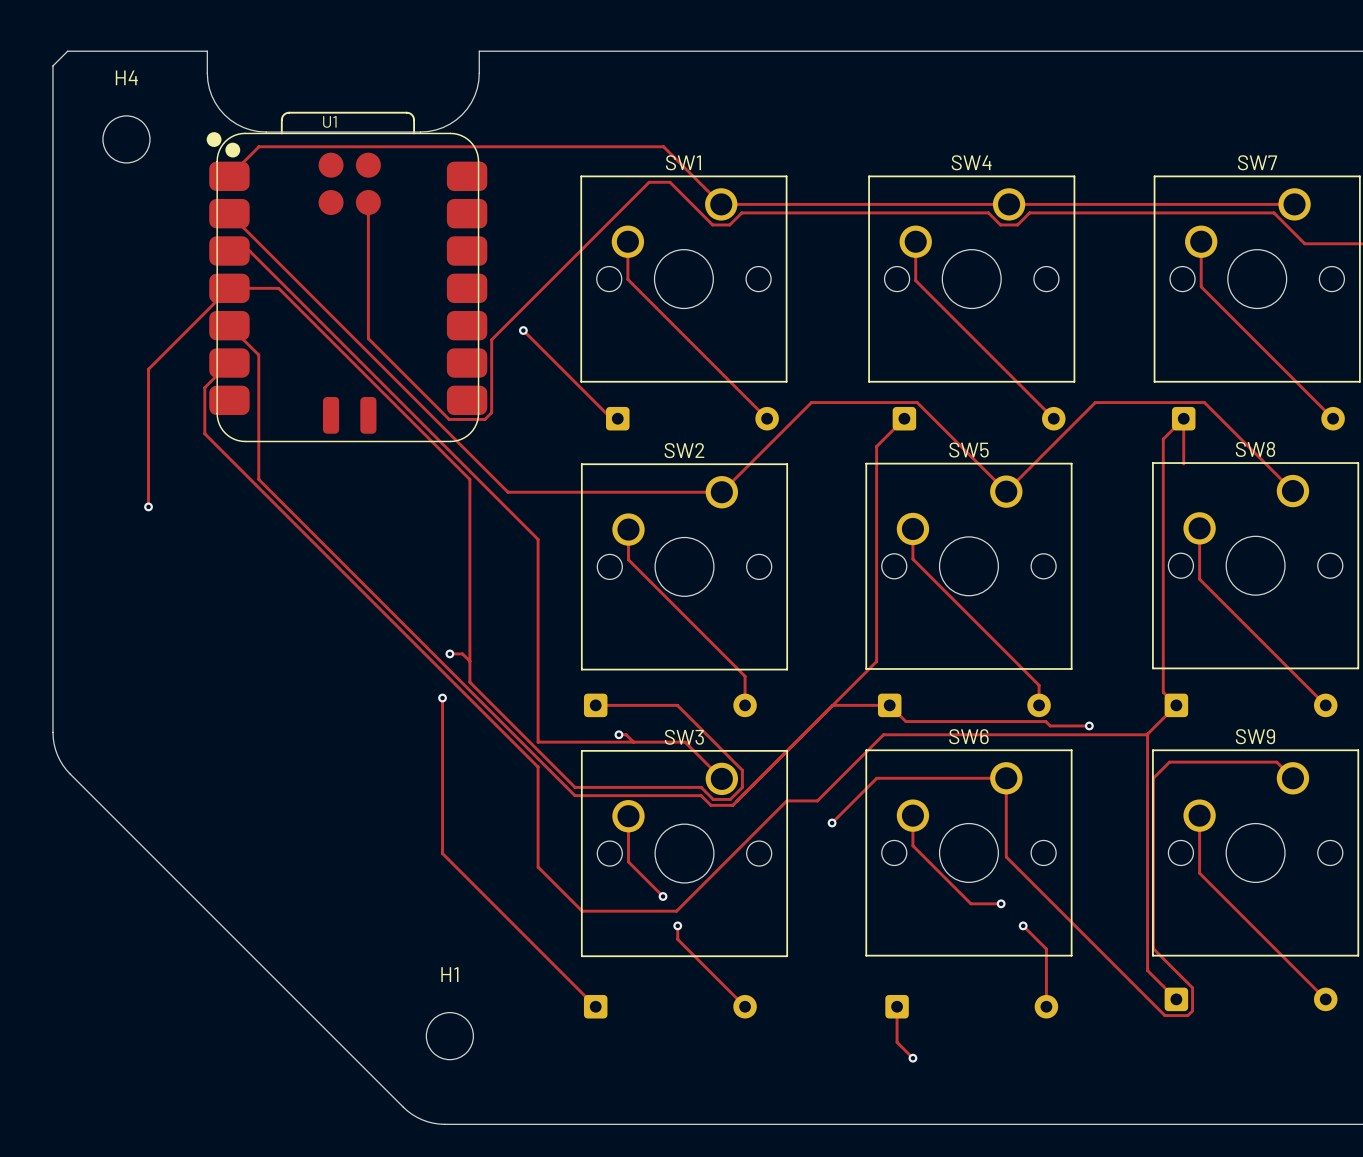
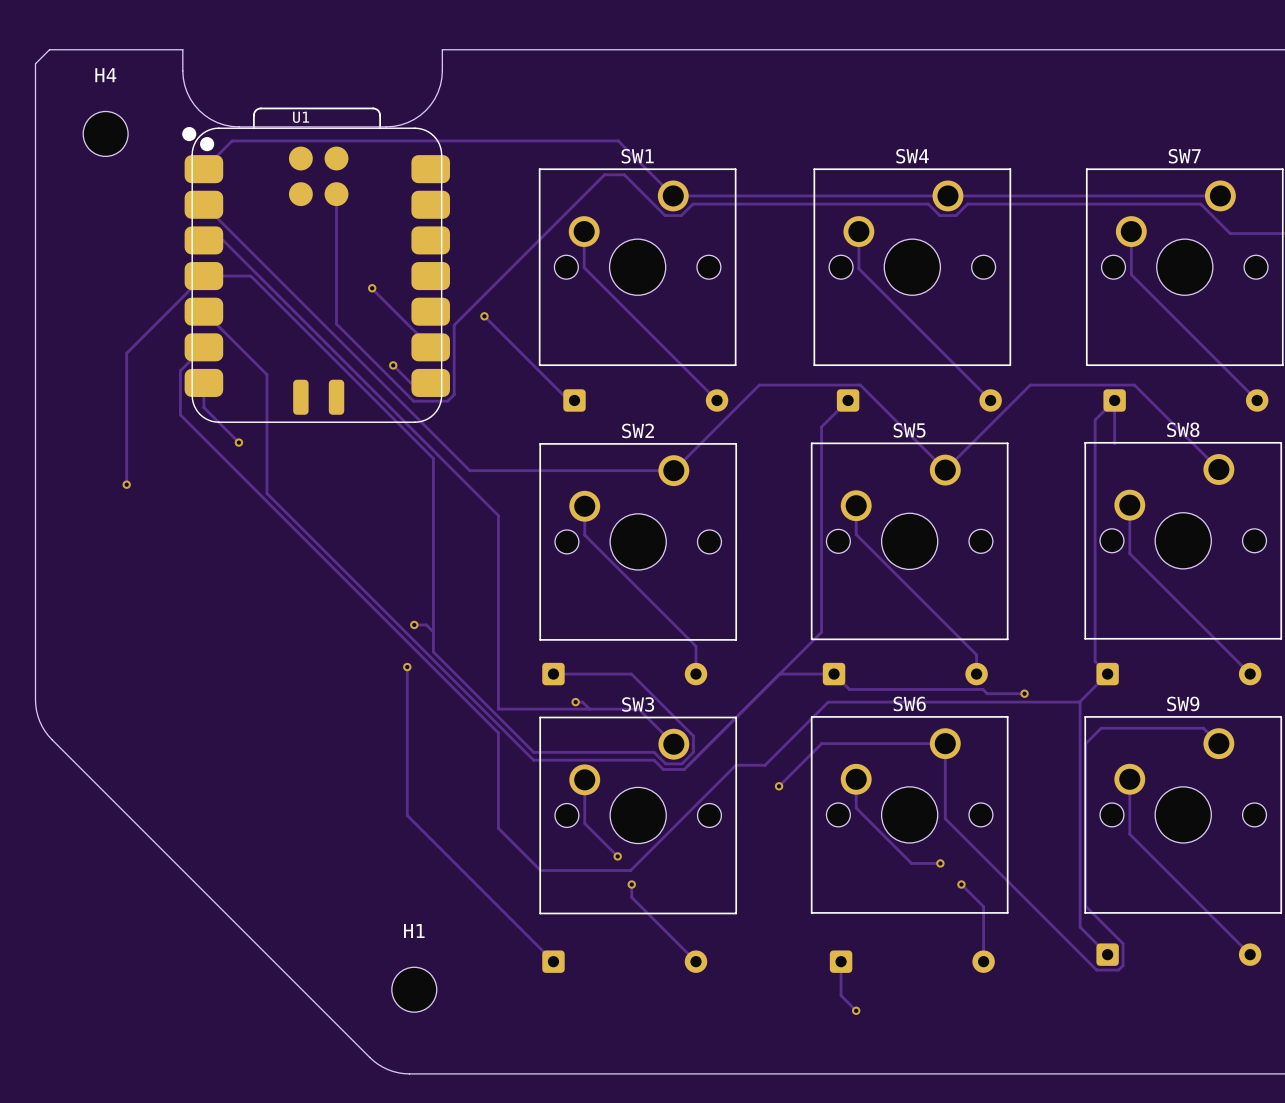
track: none -> (372, 288) (430, 347)
via: none -> (372, 288)
track: (258, 355) (258, 479) (295, 516) -> (231, 339) (266, 374) (266, 493)
track: none -> (393, 365) (410, 382) (430, 382)
via: none -> (393, 365)
track: none -> (203, 382) (203, 407) (238, 442)
via: none -> (238, 442)

